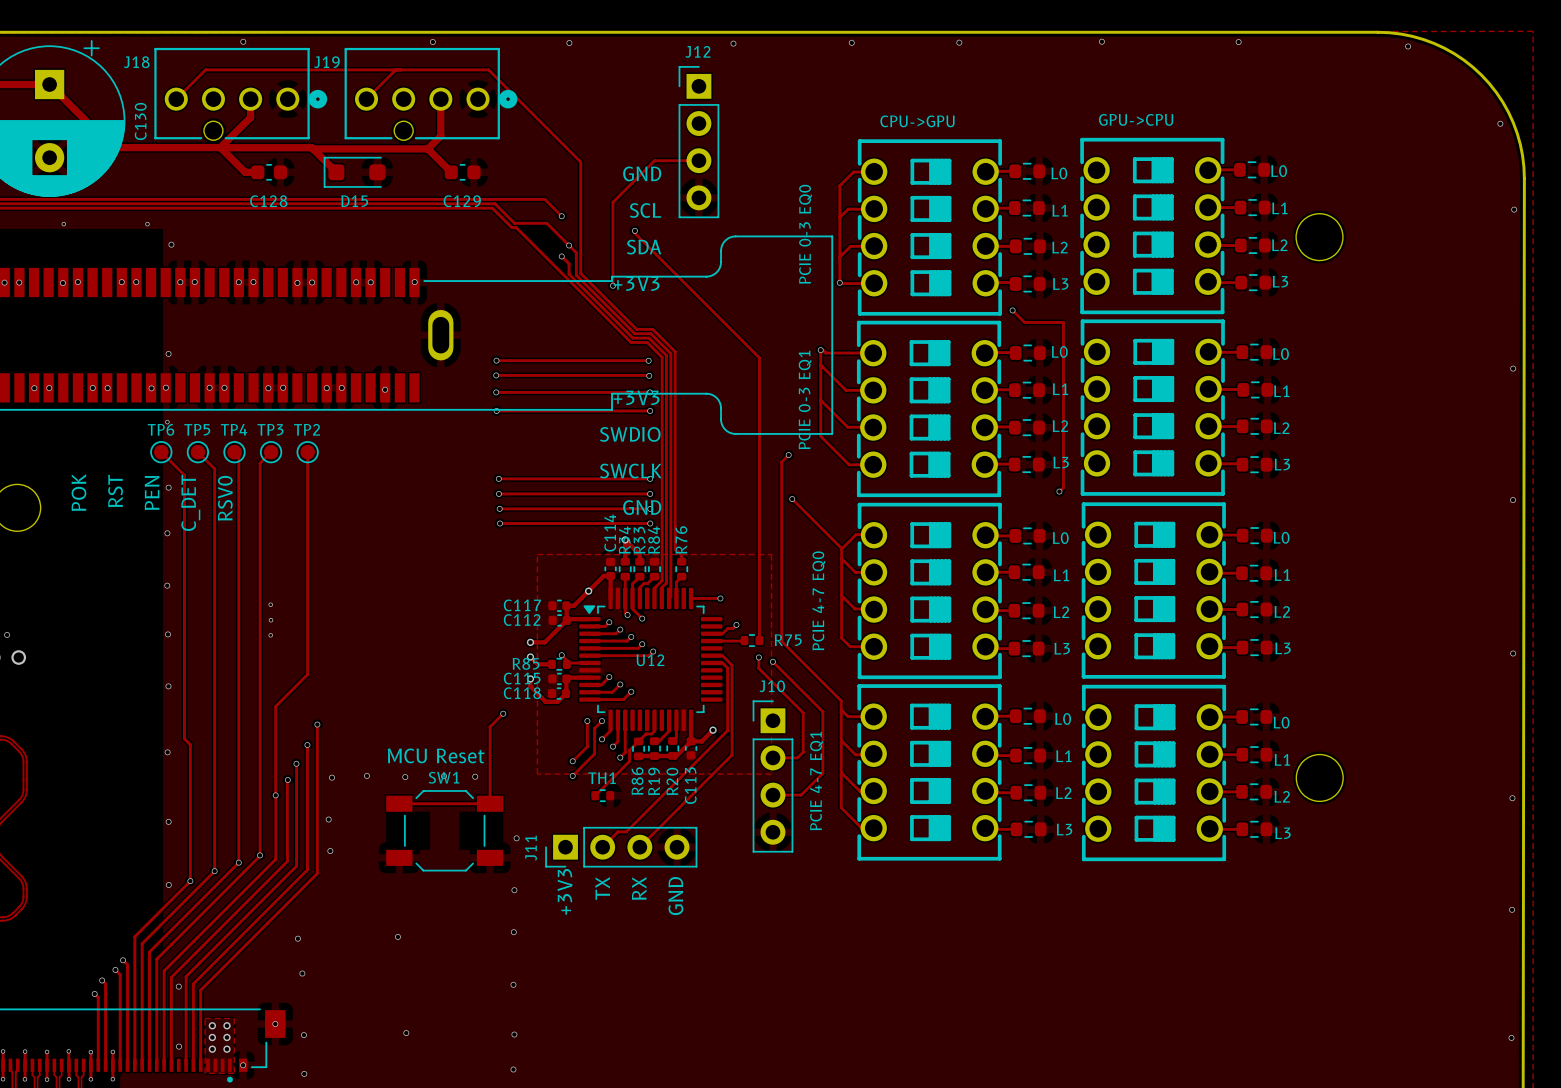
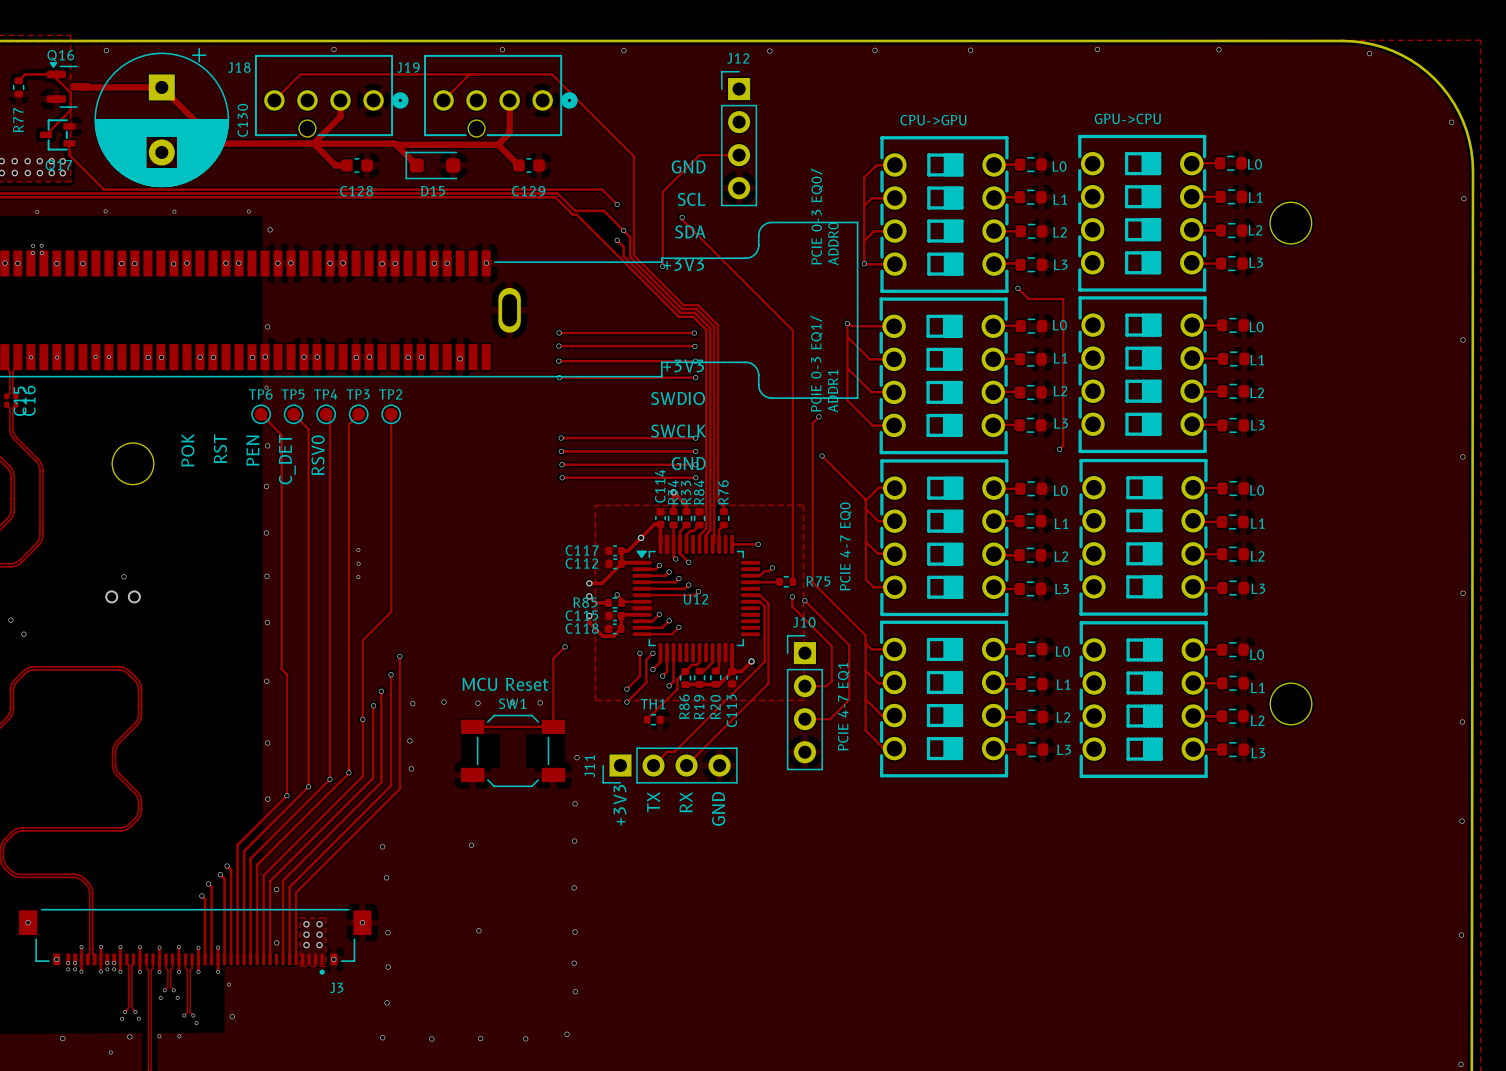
text: none -> PCIE 0-3 EQ0/ (816, 216)
text: PCIE 0-3 EQ0 (805, 234) -> ADDR0 (833, 243)
text: none -> PCIE 0-3 EQ1/ (816, 363)
text: PCIE 0-3 EQ1 (805, 400) -> ADDR1 (832, 391)

